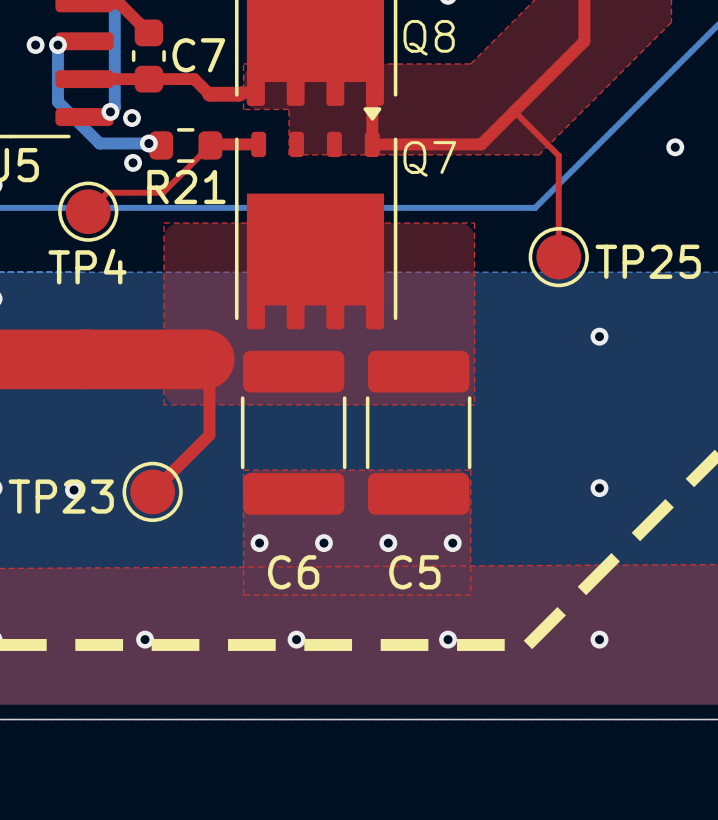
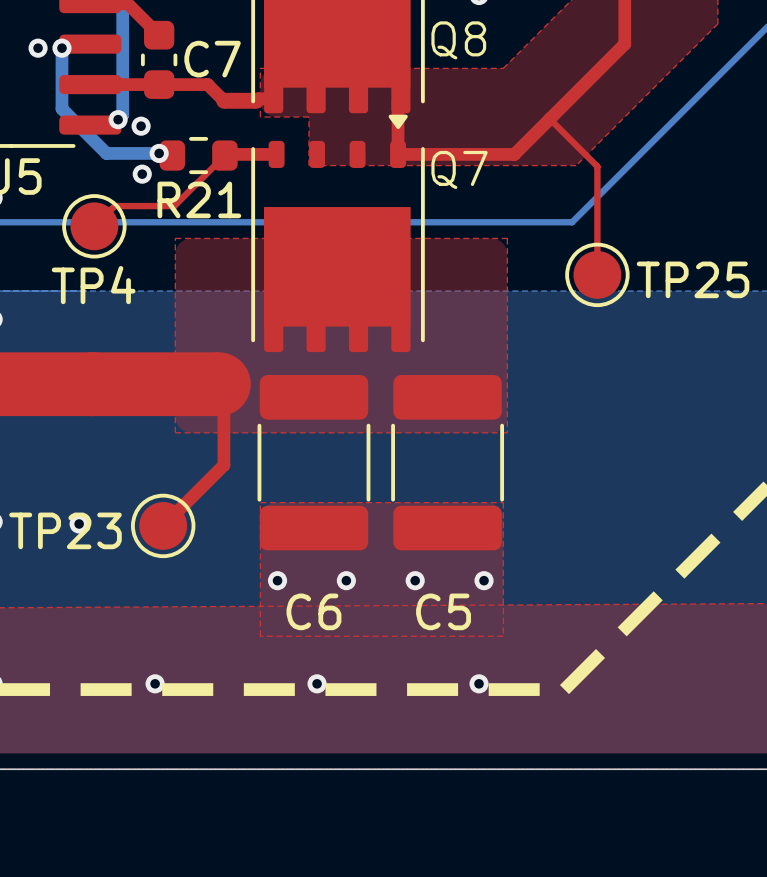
via: (675, 147) -> none
via: (599, 336) -> none
via: (599, 488) -> none
via: (599, 639) -> none

